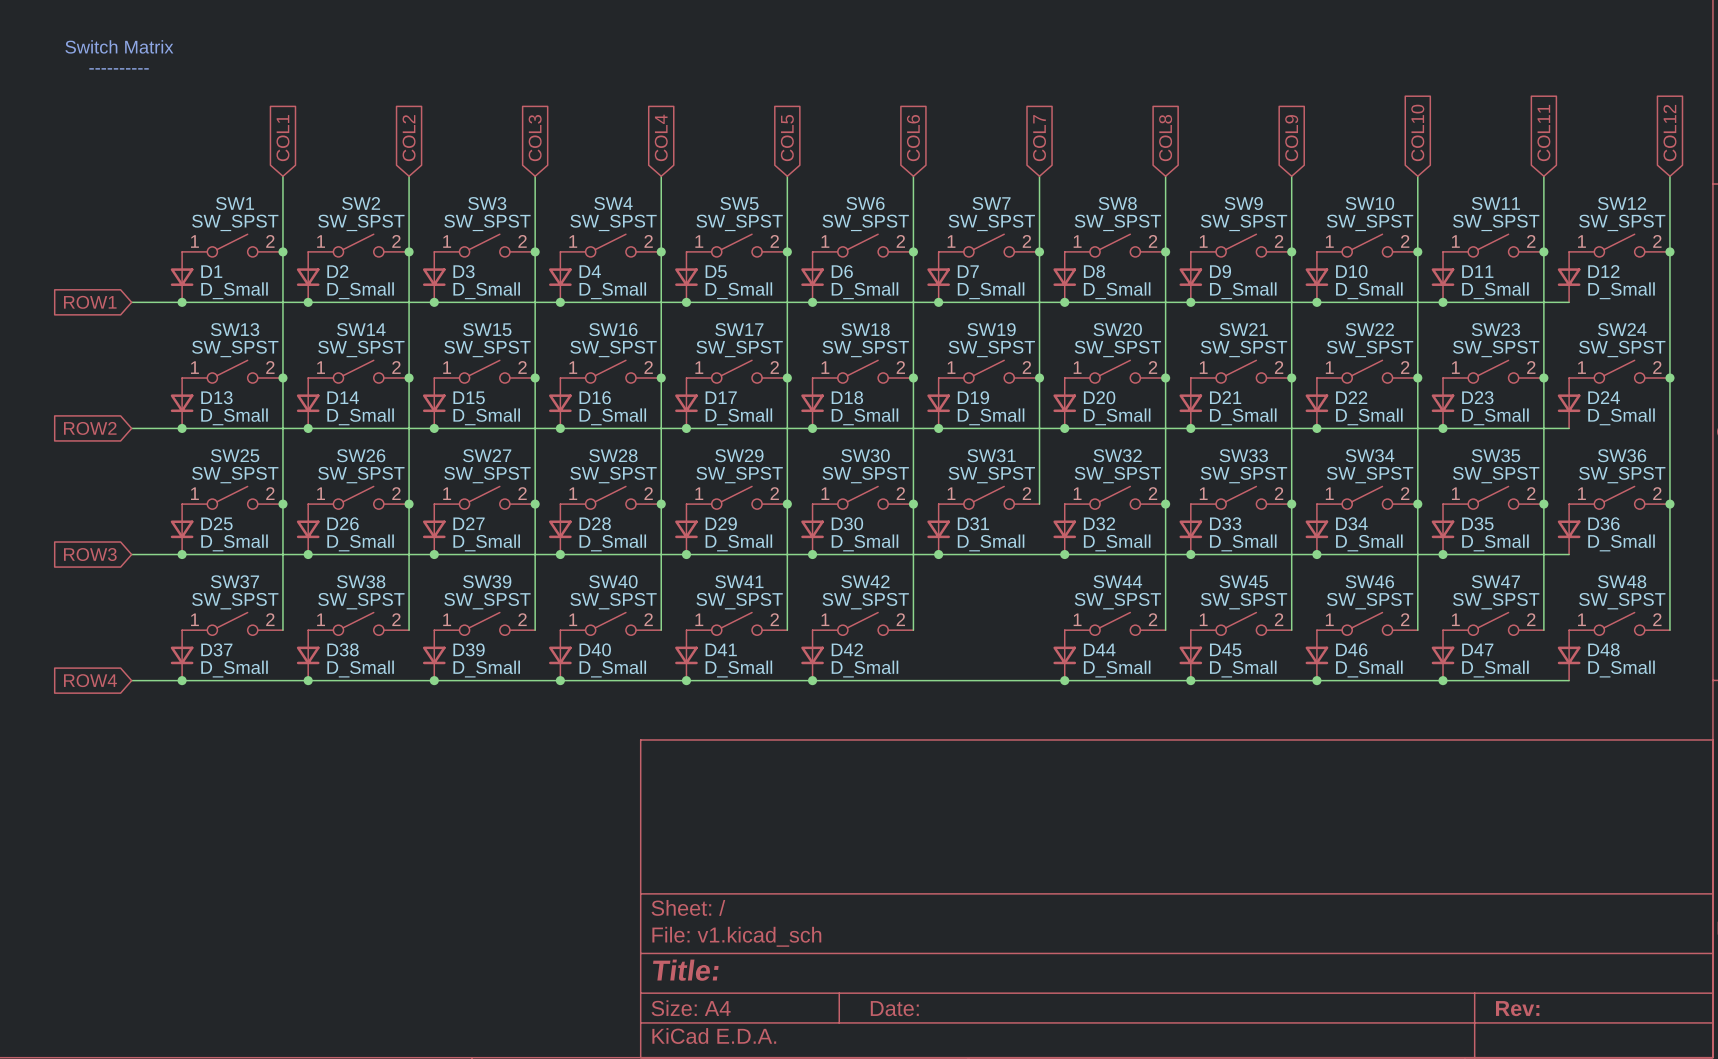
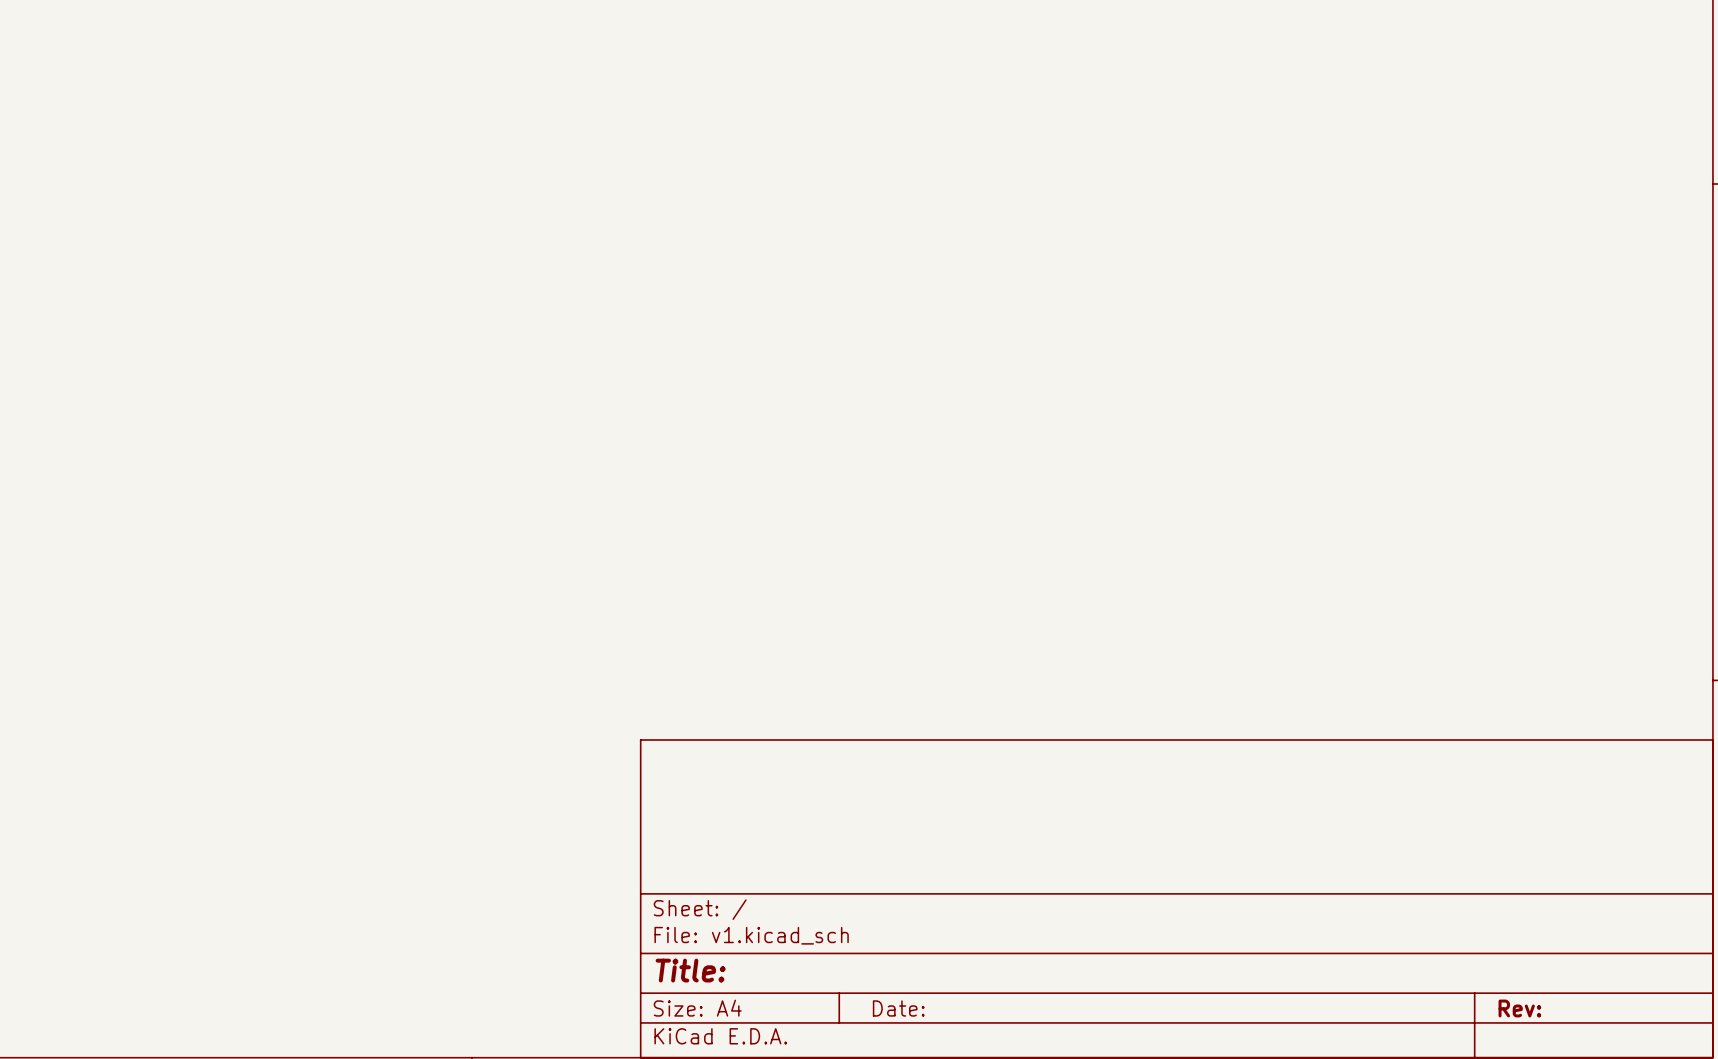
text: Switch Matrix (119, 46) -> none
text: ---------- (119, 68) -> none
global label: COL10 (1417, 132) -> none
global label: COL11 (1543, 133) -> none
global label: COL12 (1669, 133) -> none
global label: COL4 (661, 137) -> none
global label: COL1 (282, 138) -> none
global label: COL2 (409, 138) -> none
global label: COL3 (535, 138) -> none
global label: COL5 (787, 138) -> none
global label: COL6 (913, 138) -> none
global label: COL7 (1039, 138) -> none
global label: COL8 (1165, 138) -> none
global label: COL9 (1291, 138) -> none
wire: (282, 176) (282, 630) -> none
wire: (409, 176) (409, 630) -> none
wire: (535, 176) (535, 630) -> none
wire: (661, 176) (661, 630) -> none
wire: (787, 176) (787, 630) -> none
wire: (913, 176) (913, 630) -> none
wire: (1039, 176) (1039, 504) -> none
wire: (1165, 176) (1165, 630) -> none
wire: (1291, 176) (1291, 630) -> none
wire: (1417, 176) (1417, 630) -> none
wire: (1543, 176) (1543, 630) -> none
wire: (1669, 176) (1669, 630) -> none
SW1: SW_SPST (232, 245) -> none
SW2: SW_SPST (358, 245) -> none
SW3: SW_SPST (484, 245) -> none
SW4: SW_SPST (610, 245) -> none
SW5: SW_SPST (736, 245) -> none
SW6: SW_SPST (862, 245) -> none
SW7: SW_SPST (989, 245) -> none
SW8: SW_SPST (1115, 245) -> none
SW9: SW_SPST (1241, 245) -> none
SW10: SW_SPST (1367, 245) -> none
SW11: SW_SPST (1493, 245) -> none
SW12: SW_SPST (1619, 245) -> none
junction: (282, 251) -> none
junction: (409, 251) -> none
junction: (535, 251) -> none
junction: (661, 251) -> none
junction: (787, 251) -> none
junction: (913, 251) -> none
junction: (1039, 251) -> none
junction: (1165, 251) -> none
junction: (1291, 251) -> none
junction: (1417, 251) -> none
junction: (1543, 251) -> none
junction: (1669, 251) -> none
D1: D_Small (182, 277) -> none
D2: D_Small (308, 277) -> none
D3: D_Small (434, 277) -> none
D4: D_Small (560, 277) -> none
D5: D_Small (686, 277) -> none
D6: D_Small (812, 277) -> none
D7: D_Small (938, 277) -> none
D8: D_Small (1064, 277) -> none
D9: D_Small (1190, 277) -> none
D10: D_Small (1316, 277) -> none
D11: D_Small (1443, 277) -> none
D12: D_Small (1569, 277) -> none
global label: ROW1 (90, 302) -> none
wire: (131, 302) (1569, 302) -> none
junction: (182, 302) -> none
junction: (308, 302) -> none
junction: (434, 302) -> none
junction: (560, 302) -> none
junction: (686, 302) -> none
junction: (812, 302) -> none
junction: (938, 302) -> none
junction: (1064, 302) -> none
junction: (1190, 302) -> none
junction: (1316, 302) -> none
junction: (1443, 302) -> none
SW13: SW_SPST (232, 371) -> none
SW14: SW_SPST (358, 371) -> none
SW15: SW_SPST (484, 371) -> none
SW16: SW_SPST (610, 371) -> none
SW17: SW_SPST (736, 371) -> none
SW18: SW_SPST (862, 371) -> none
SW19: SW_SPST (989, 371) -> none
SW20: SW_SPST (1115, 371) -> none
SW21: SW_SPST (1241, 371) -> none
SW22: SW_SPST (1367, 371) -> none
SW23: SW_SPST (1493, 371) -> none
SW24: SW_SPST (1619, 371) -> none
junction: (282, 378) -> none
junction: (409, 378) -> none
junction: (535, 378) -> none
junction: (661, 378) -> none
junction: (787, 378) -> none
junction: (913, 378) -> none
junction: (1039, 378) -> none
junction: (1165, 378) -> none
junction: (1291, 378) -> none
junction: (1417, 378) -> none
junction: (1543, 378) -> none
junction: (1669, 378) -> none
D13: D_Small (182, 403) -> none
D14: D_Small (308, 403) -> none
D15: D_Small (434, 403) -> none
D16: D_Small (560, 403) -> none
D17: D_Small (686, 403) -> none
D18: D_Small (812, 403) -> none
D19: D_Small (938, 403) -> none
D20: D_Small (1064, 403) -> none
D21: D_Small (1190, 403) -> none
D22: D_Small (1316, 403) -> none
D23: D_Small (1443, 403) -> none
D24: D_Small (1569, 403) -> none
global label: ROW2 (90, 428) -> none
wire: (131, 428) (1569, 428) -> none
junction: (182, 428) -> none
junction: (308, 428) -> none
junction: (434, 428) -> none
junction: (560, 428) -> none
junction: (686, 428) -> none
junction: (812, 428) -> none
junction: (938, 428) -> none
junction: (1064, 428) -> none
junction: (1190, 428) -> none
junction: (1316, 428) -> none
junction: (1443, 428) -> none
SW25: SW_SPST (232, 497) -> none
SW26: SW_SPST (358, 497) -> none
SW27: SW_SPST (484, 497) -> none
SW28: SW_SPST (610, 497) -> none
SW29: SW_SPST (736, 497) -> none
SW30: SW_SPST (862, 497) -> none
SW31: SW_SPST (989, 497) -> none
SW32: SW_SPST (1115, 497) -> none
SW33: SW_SPST (1241, 497) -> none
SW34: SW_SPST (1367, 497) -> none
SW35: SW_SPST (1493, 497) -> none
SW36: SW_SPST (1619, 497) -> none
junction: (282, 504) -> none
junction: (409, 504) -> none
junction: (535, 504) -> none
junction: (661, 504) -> none
junction: (787, 504) -> none
junction: (913, 504) -> none
junction: (1165, 504) -> none
junction: (1291, 504) -> none
junction: (1417, 504) -> none
junction: (1543, 504) -> none
junction: (1669, 504) -> none
D25: D_Small (182, 529) -> none
D26: D_Small (308, 529) -> none
D27: D_Small (434, 529) -> none
D28: D_Small (560, 529) -> none
D29: D_Small (686, 529) -> none
D30: D_Small (812, 529) -> none
D31: D_Small (938, 529) -> none
D32: D_Small (1064, 529) -> none
D33: D_Small (1190, 529) -> none
D34: D_Small (1316, 529) -> none
D35: D_Small (1443, 529) -> none
D36: D_Small (1569, 529) -> none
global label: ROW3 (90, 554) -> none
wire: (131, 554) (1569, 554) -> none
junction: (182, 554) -> none
junction: (308, 554) -> none
junction: (434, 554) -> none
junction: (560, 554) -> none
junction: (686, 554) -> none
junction: (812, 554) -> none
junction: (938, 554) -> none
junction: (1064, 554) -> none
junction: (1190, 554) -> none
junction: (1316, 554) -> none
junction: (1443, 554) -> none
SW37: SW_SPST (232, 623) -> none
SW38: SW_SPST (358, 623) -> none
SW39: SW_SPST (484, 623) -> none
SW40: SW_SPST (610, 623) -> none
SW41: SW_SPST (736, 623) -> none
SW42: SW_SPST (862, 623) -> none
SW44: SW_SPST (1115, 623) -> none
SW45: SW_SPST (1241, 623) -> none
SW46: SW_SPST (1367, 623) -> none
SW47: SW_SPST (1493, 623) -> none
SW48: SW_SPST (1619, 623) -> none
D37: D_Small (182, 655) -> none
D38: D_Small (308, 655) -> none
D39: D_Small (434, 655) -> none
D40: D_Small (560, 655) -> none
D41: D_Small (686, 655) -> none
D42: D_Small (812, 655) -> none
D44: D_Small (1064, 655) -> none
D45: D_Small (1190, 655) -> none
D46: D_Small (1316, 655) -> none
D47: D_Small (1443, 655) -> none
D48: D_Small (1569, 655) -> none
global label: ROW4 (90, 680) -> none
wire: (131, 680) (1569, 680) -> none
junction: (182, 680) -> none
junction: (308, 680) -> none
junction: (434, 680) -> none
junction: (560, 680) -> none
junction: (686, 680) -> none
junction: (812, 680) -> none
junction: (1064, 680) -> none
junction: (1190, 680) -> none
junction: (1316, 680) -> none
junction: (1443, 680) -> none

